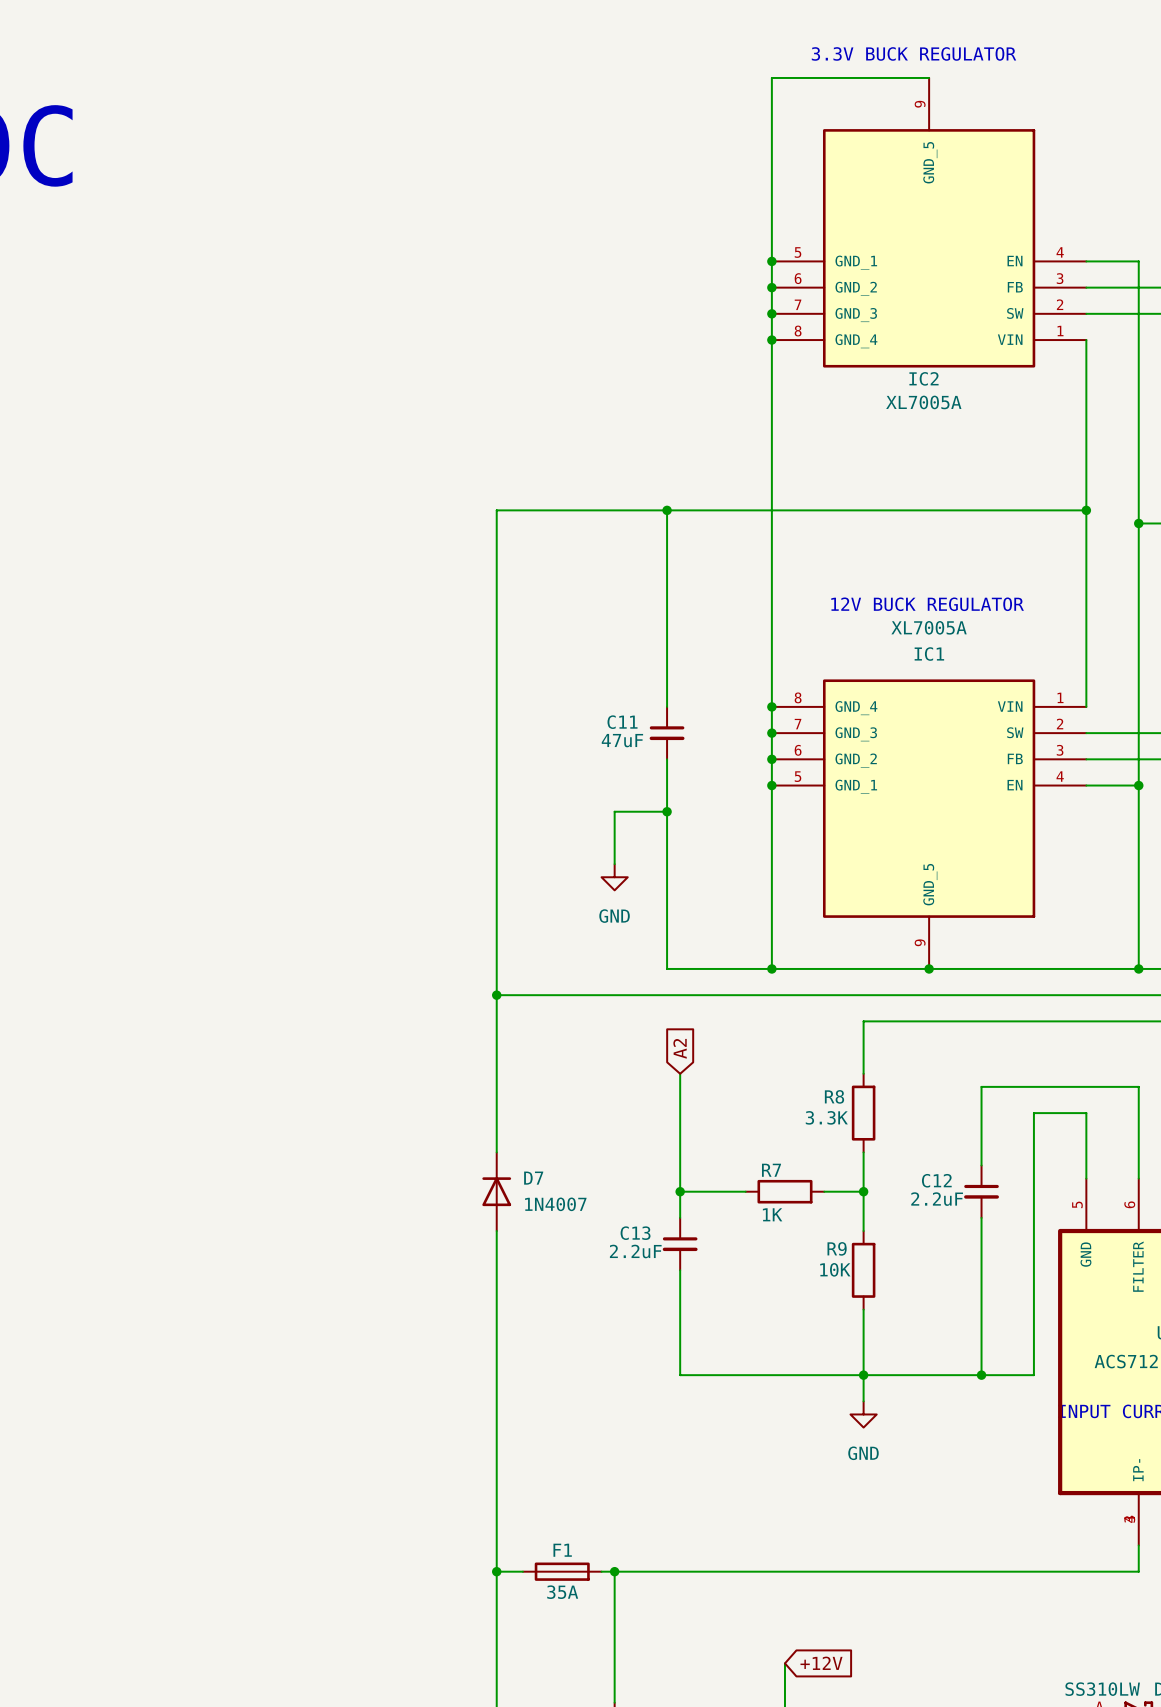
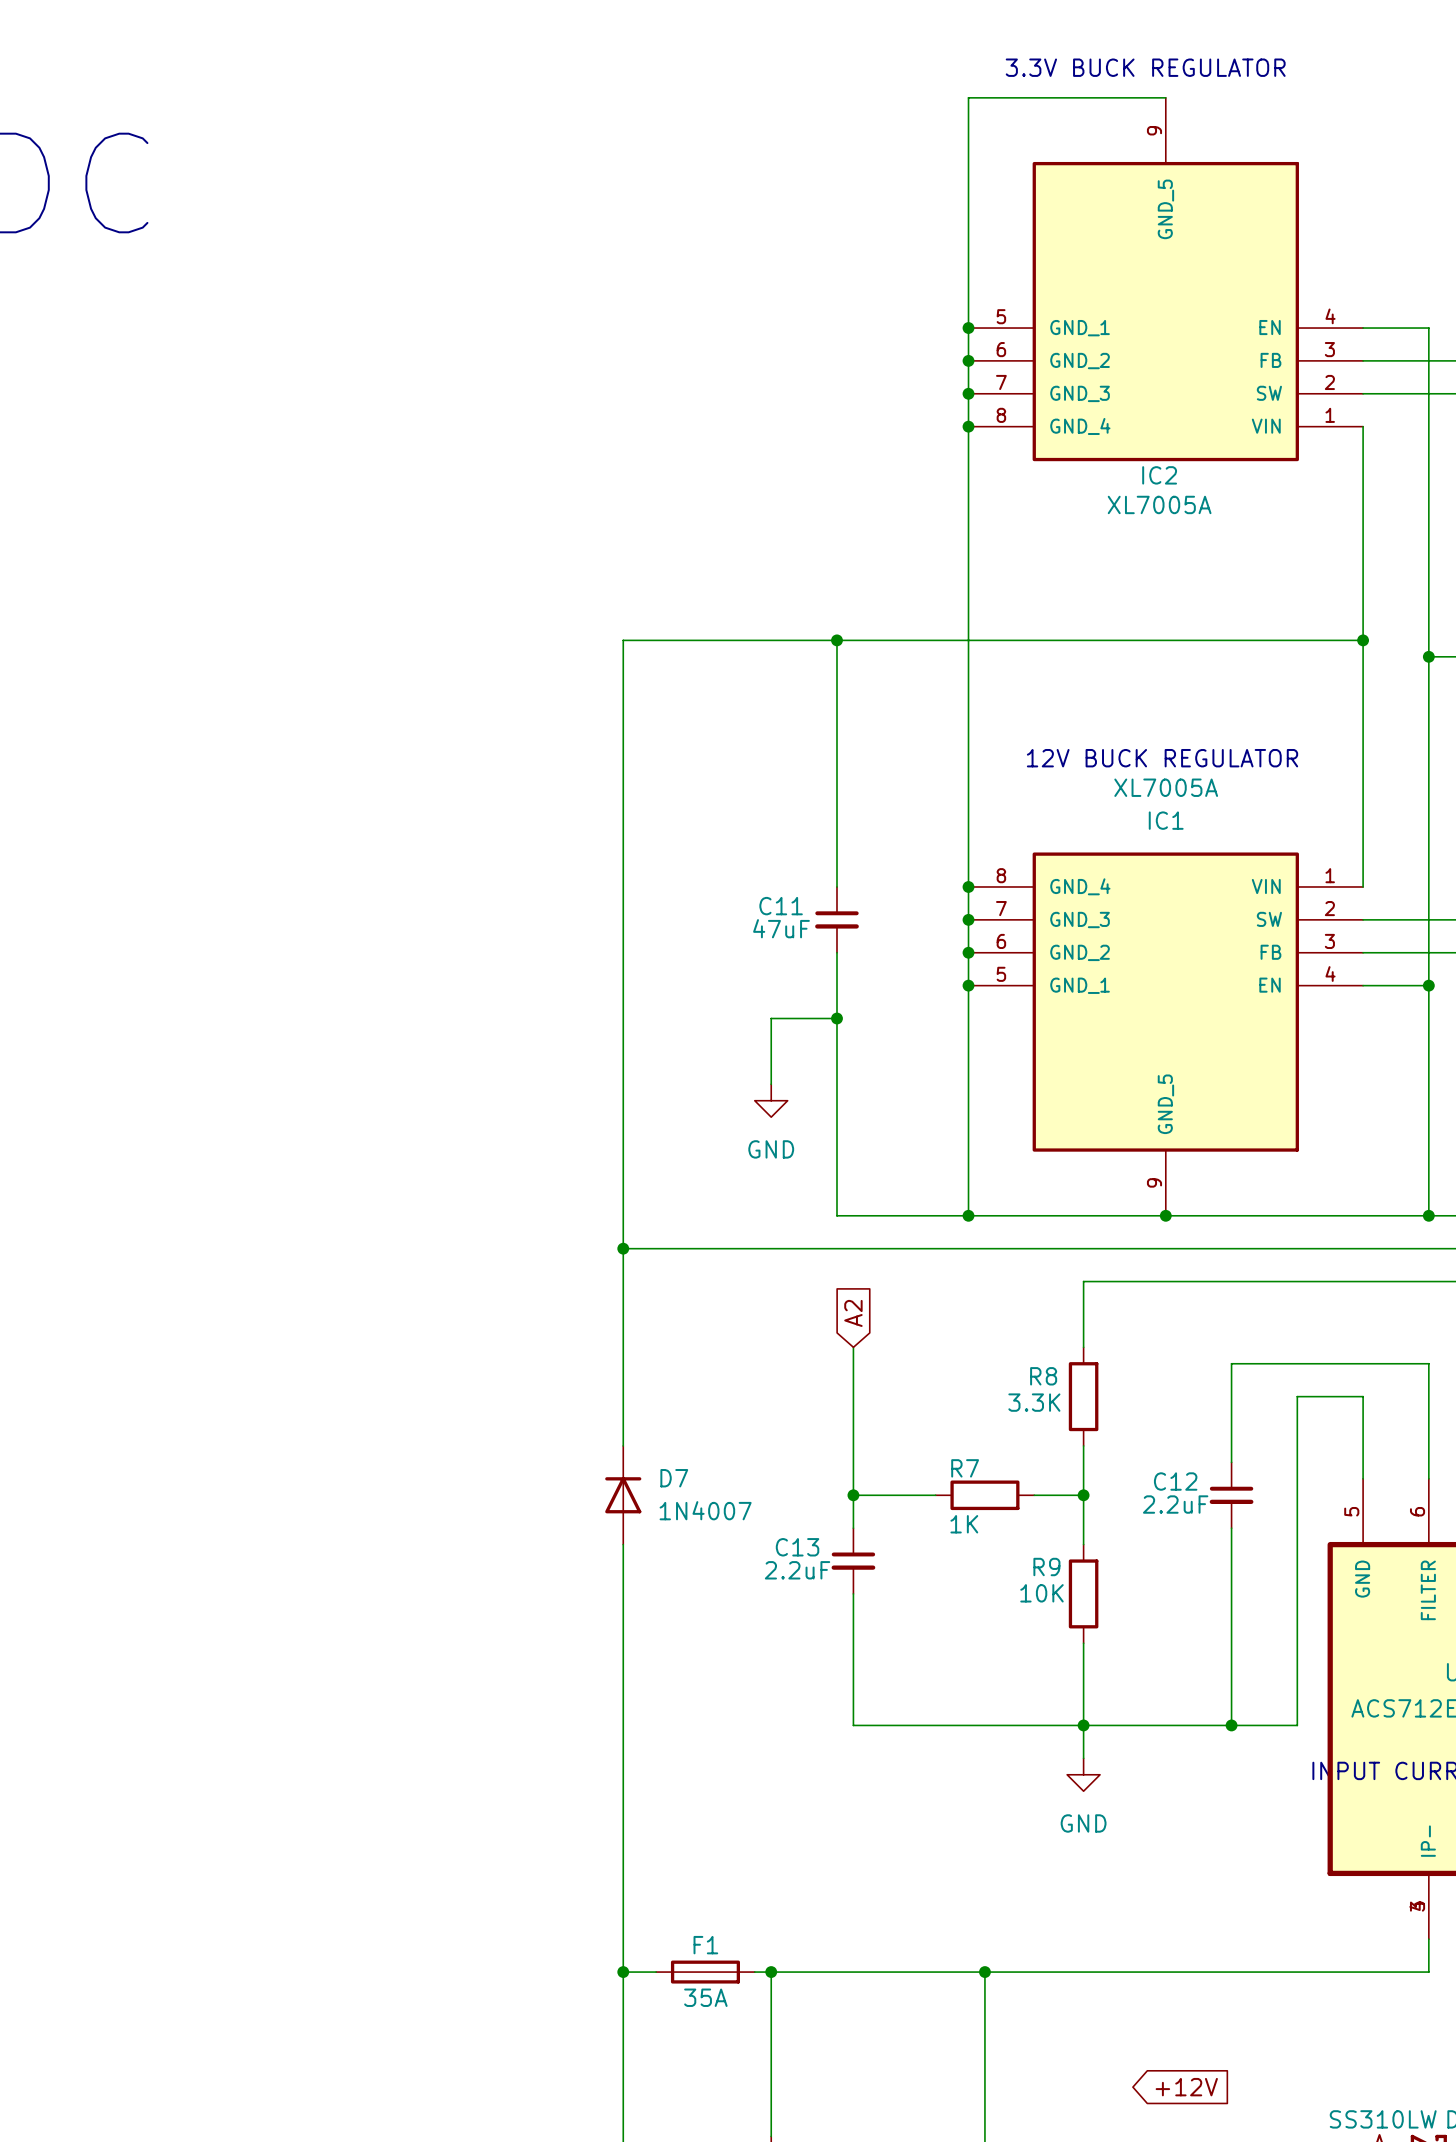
wire: none -> (984, 1972) (984, 2087)
junction: none -> (984, 1972)
global label position: +12V (821, 1663) -> +12V (1186, 2087)

